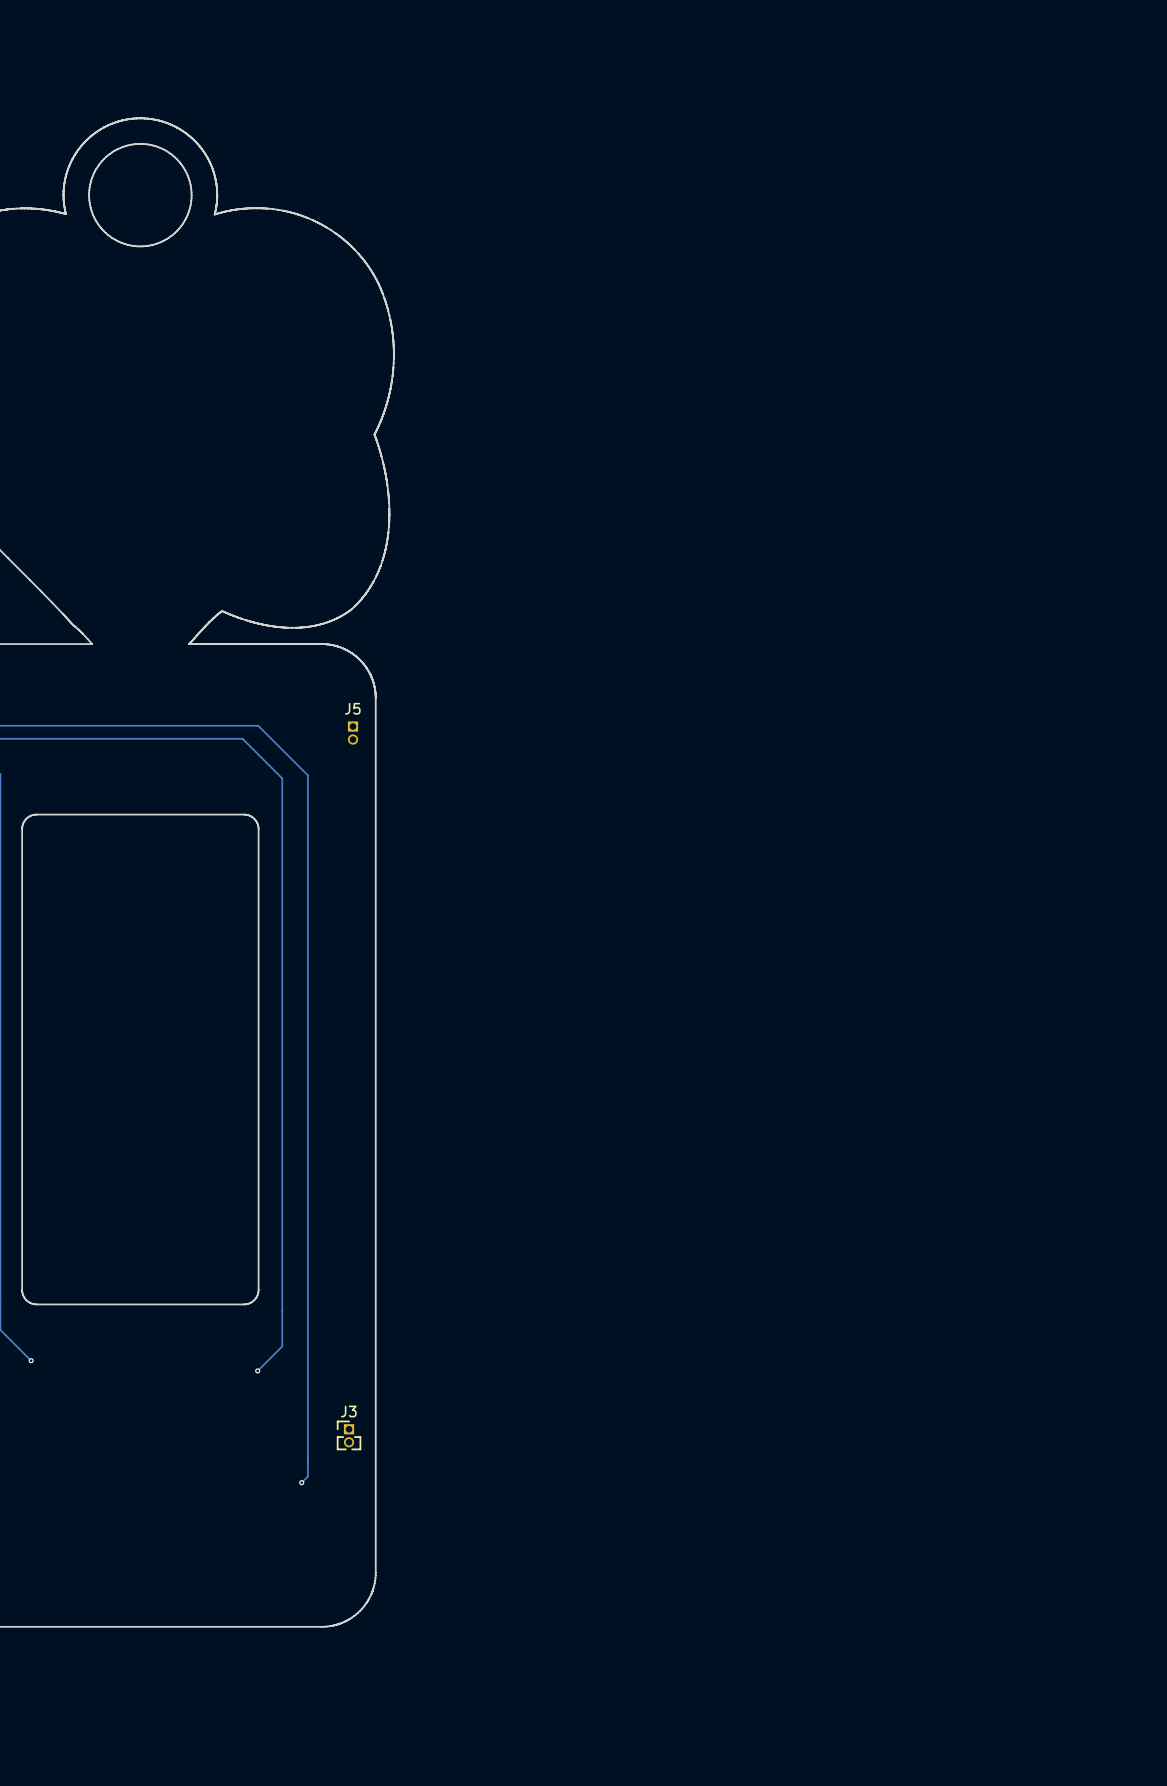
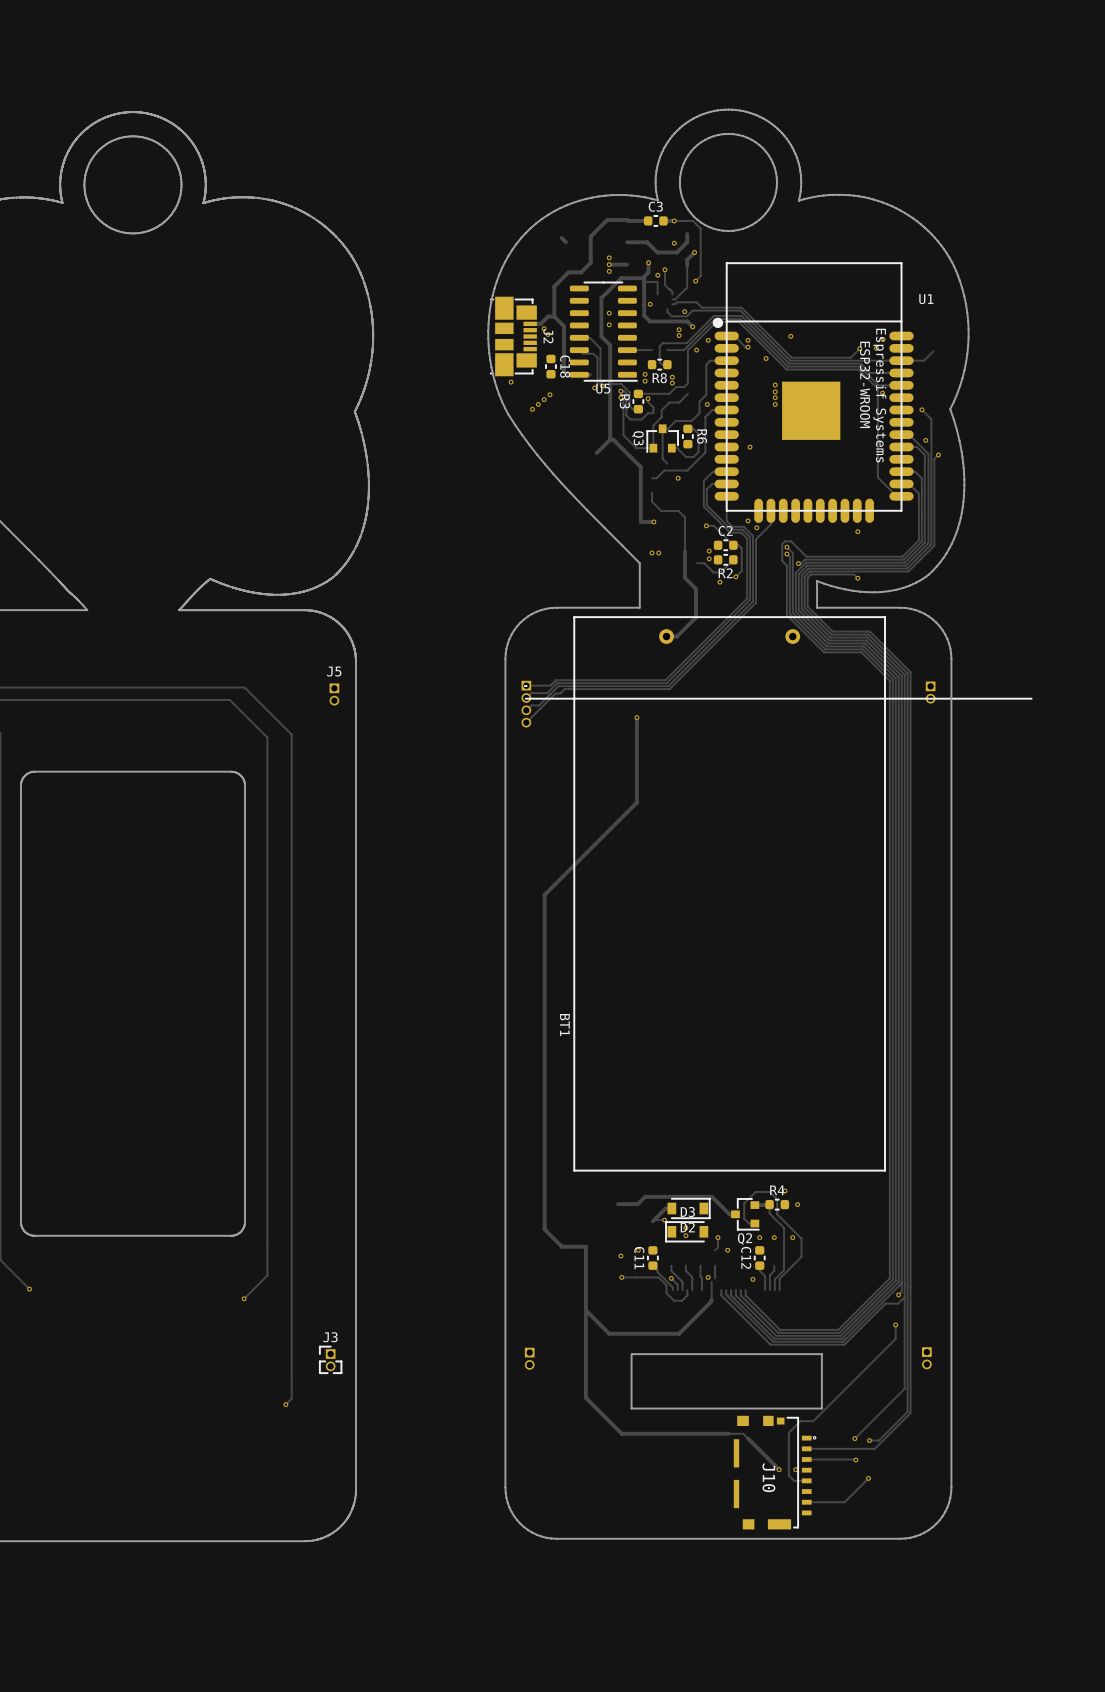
drawing: none -> [487, 109, 970, 1540]
track: none -> (648, 220) (607, 219) (590, 236) (590, 262) (581, 272) (568, 272) (554, 286) (554, 316)
C3: none -> (655, 220)
track: none -> (663, 220) (692, 220) (700, 228) (700, 276) (695, 281)
via: none -> (674, 220)
track: none -> (687, 233) (687, 242) (676, 252) (657, 252) (647, 242) (627, 242)
track: none -> (561, 237) (566, 242)
via: none -> (674, 243)
track: none -> (694, 252) (687, 259) (687, 287) (675, 299) (672, 299)
via: none -> (694, 252)
via: none -> (609, 257)
track: none -> (648, 262) (648, 272) (642, 278)
via: none -> (648, 262)
via: none -> (609, 264)
track: none -> (627, 264) (609, 264)
track: none -> (664, 269) (664, 285) (672, 291) (672, 294)
via: none -> (664, 269)
via: none -> (609, 271)
via: none -> (657, 275)
via: none -> (695, 281)
track: none -> (644, 283) (657, 282) (657, 294)
via: none -> (650, 304)
track: none -> (672, 304) (677, 302) (696, 302) (702, 307) (741, 307) (791, 357) (850, 357) (859, 348)
track: none -> (667, 309) (671, 316) (686, 316) (692, 310) (740, 310) (790, 360) (924, 360) (933, 351)
via: none -> (684, 311)
via: none -> (609, 313)
track: none -> (554, 316) (548, 316) (540, 323) (530, 323)
track: none -> (554, 316) (564, 326) (564, 371) (566, 374) (589, 374)
via: none -> (609, 324)
track: none -> (692, 326) (687, 321) (650, 321) (644, 315) (644, 278) (621, 278) (601, 298) (601, 336) (610, 345) (610, 439)
via: none -> (692, 326)
via: none -> (544, 328)
via: none -> (679, 329)
U5: none -> (603, 331)
via: none -> (548, 334)
via: none -> (679, 335)
track: none -> (734, 336) (745, 347) (748, 347)
J2: none -> (513, 336)
via: none -> (790, 336)
track: none -> (579, 337) (589, 337) (600, 348) (600, 384) (602, 386)
via: none -> (883, 339)
via: none -> (708, 340)
via: none -> (748, 340)
via: none -> (748, 347)
via: none -> (876, 348)
via: none -> (859, 348)
track: none -> (579, 350) (582, 353) (593, 353) (597, 357) (597, 385) (594, 387)
track: none -> (652, 350) (627, 350)
track: none -> (667, 350) (683, 350) (715, 319) (740, 319) (787, 366) (859, 366) (878, 385) (901, 385)
via: none -> (696, 350)
via: none -> (766, 358)
track: none -> (726, 360) (710, 360) (706, 364) (706, 394) (699, 401) (699, 413) (691, 420) (675, 420) (667, 428) (662, 428) (662, 458) (667, 463)
R8: none -> (659, 364)
track: none -> (667, 364) (662, 364) (659, 362) (659, 346) (662, 343) (686, 343) (713, 316) (741, 316) (789, 363) (860, 363) (870, 373) (901, 373)
C18: none -> (550, 366)
via: none -> (645, 374)
via: none -> (672, 377)
via: none -> (645, 381)
via: none -> (511, 382)
via: none -> (672, 383)
track: none -> (610, 384) (621, 384) (629, 392) (629, 406) (632, 409) (638, 409)
via: none -> (775, 385)
via: none -> (602, 386)
via: none -> (594, 387)
track: none -> (620, 391) (626, 393) (626, 415) (630, 419) (641, 419) (648, 413) (653, 413) (653, 407) (648, 402) (648, 398)
via: none -> (620, 391)
via: none -> (775, 391)
U1: none -> (813, 392)
via: none -> (882, 393)
track: none -> (638, 393) (669, 393) (676, 386) (684, 386) (687, 383) (687, 350) (716, 321) (739, 321) (786, 369) (858, 369) (877, 388) (877, 477) (896, 496) (901, 496)
track: none -> (687, 393) (679, 402) (669, 402) (661, 410) (661, 417) (653, 425) (653, 448) (636, 448) (623, 435) (623, 400) (620, 397)
via: none -> (549, 394)
via: none -> (620, 397)
via: none -> (775, 397)
via: none -> (648, 398)
via: none -> (544, 399)
R3: none -> (638, 401)
via: none -> (538, 404)
via: none -> (707, 404)
via: none -> (775, 404)
via: none -> (532, 409)
track: none -> (726, 410) (712, 410) (705, 417) (705, 452) (687, 470) (664, 470) (656, 478) (652, 478)
track: none -> (921, 409) (931, 419) (931, 544) (907, 568) (808, 568) (801, 575) (801, 608) (830, 637) (867, 637) (904, 674) (904, 1388) (854, 1438)
via: none -> (921, 409)
track: none -> (687, 428) (693, 428) (698, 433) (698, 452) (693, 456) (685, 456) (677, 448) (671, 448)
track: none -> (901, 434) (909, 434) (928, 453) (928, 543) (906, 565) (807, 565) (798, 574) (798, 610) (829, 640) (866, 640) (901, 675) (901, 1291) (898, 1294)
R6: none -> (687, 436)
Q3: none -> (662, 438)
track: none -> (610, 439) (596, 453)
track: none -> (610, 439) (613, 439) (640, 467) (640, 521) (653, 521)
via: none -> (925, 440)
track: none -> (901, 447) (916, 447) (924, 454) (924, 542) (904, 562) (806, 562) (795, 572) (795, 611) (827, 643) (865, 643) (898, 677) (898, 1282) (842, 1338) (774, 1338) (731, 1295) (731, 1290)
via: none -> (750, 447)
track: none -> (938, 454) (934, 459) (934, 545) (908, 571) (809, 571) (804, 576) (804, 607) (831, 634) (868, 634) (907, 673) (907, 1411) (878, 1440) (869, 1440)
via: none -> (938, 454)
track: none -> (726, 471) (713, 471) (703, 480) (703, 506) (730, 532) (741, 532) (747, 538) (747, 598) (665, 680) (555, 680) (550, 685) (526, 685)
track: none -> (901, 471) (915, 471) (921, 478) (921, 541) (903, 559) (804, 559) (800, 564) (798, 563)
via: none -> (678, 478)
track: none -> (726, 483) (712, 483) (706, 489) (706, 505) (731, 529) (742, 529) (750, 537) (750, 599) (666, 683) (557, 683) (547, 693) (531, 693) (526, 697)
track: none -> (901, 483) (909, 483) (918, 493) (918, 540) (902, 556) (806, 556) (791, 541) (784, 541) (782, 544) (782, 560) (786, 565) (786, 615) (824, 652) (861, 652) (889, 680) (889, 1278) (838, 1329) (780, 1329) (745, 1295) (745, 1290)
track: none -> (652, 492) (652, 501) (661, 510) (678, 510) (684, 517) (684, 577) (696, 588) (696, 616) (676, 636) (666, 636)
track: none -> (726, 496) (726, 520) (732, 526) (743, 526) (753, 536) (753, 601) (668, 686) (558, 686) (539, 705) (531, 705) (526, 710)
track: none -> (770, 510) (770, 524) (755, 539) (755, 602) (669, 689) (564, 689) (560, 693) (555, 693) (526, 722)
via: none -> (748, 520)
via: none -> (653, 521)
track: none -> (706, 525) (713, 525) (733, 545) (738, 545) (741, 548) (741, 571) (735, 576)
via: none -> (706, 525)
via: none -> (756, 527)
via: none -> (857, 531)
C2: none -> (725, 545)
track: none -> (786, 547) (792, 553) (792, 612) (826, 646) (863, 646) (895, 678) (895, 1280) (840, 1335) (776, 1335) (735, 1295) (735, 1290)
via: none -> (786, 547)
via: none -> (709, 551)
via: none -> (651, 553)
via: none -> (658, 553)
track: none -> (786, 554) (789, 556) (789, 613) (825, 649) (862, 649) (892, 679) (892, 1279) (839, 1332) (778, 1332) (740, 1295) (740, 1290)
via: none -> (786, 554)
via: none -> (709, 558)
R2: none -> (725, 559)
track: none -> (733, 559) (720, 572) (713, 572) (704, 563) (697, 563)
via: none -> (798, 563)
via: none -> (735, 576)
track: none -> (857, 578) (854, 574) (810, 574) (807, 577) (807, 606) (832, 631) (869, 631) (910, 672) (910, 1413) (874, 1448) (806, 1448)
via: none -> (857, 578)
via: none -> (719, 582)
line: none -> (526, 686) (524, 686)
part: none -> (930, 692)
line: none -> (1031, 698) (525, 698)
part: none -> (526, 704)
track: none -> (636, 717) (636, 802) (544, 894) (544, 1229) (562, 1246) (585, 1246) (585, 1397) (621, 1433) (743, 1433) (779, 1469)
via: none -> (636, 717)
BT1: none -> (729, 893)
via: none -> (784, 1191)
track: none -> (625, 1204) (617, 1204) (637, 1204) (645, 1196) (712, 1196) (729, 1214) (735, 1214)
R4: none -> (777, 1204)
via: none -> (797, 1204)
track: none -> (754, 1205) (769, 1204) (769, 1213) (784, 1227) (784, 1270) (774, 1279) (774, 1290)
track: none -> (671, 1208) (665, 1208) (652, 1221) (664, 1220)
D2: none -> (688, 1208)
Q2: none -> (745, 1214)
via: none -> (664, 1220)
track: none -> (754, 1223) (749, 1223) (744, 1218) (744, 1203) (755, 1191) (770, 1191) (777, 1199) (777, 1214) (801, 1238) (801, 1256) (779, 1278) (779, 1290)
via: none -> (685, 1227)
D3: none -> (686, 1231)
via: none -> (685, 1235)
track: none -> (717, 1237) (717, 1247) (715, 1250)
via: none -> (717, 1237)
via: none -> (759, 1237)
via: none -> (774, 1237)
via: none -> (792, 1237)
via: none -> (638, 1250)
via: none -> (727, 1250)
via: none -> (620, 1256)
C11: none -> (652, 1258)
C12: none -> (759, 1258)
track: none -> (652, 1265) (672, 1287) (672, 1290)
track: none -> (671, 1265) (671, 1270) (682, 1282) (682, 1290)
track: none -> (685, 1265) (685, 1270) (692, 1277) (692, 1290)
track: none -> (700, 1265) (701, 1290)
track: none -> (715, 1265) (715, 1278)
track: none -> (759, 1265) (759, 1270) (765, 1276) (765, 1290)
track: none -> (774, 1265) (774, 1270) (769, 1275) (769, 1290)
track: none -> (621, 1277) (658, 1277) (666, 1285) (666, 1293) (674, 1300) (682, 1300) (687, 1295) (687, 1290)
via: none -> (621, 1277)
via: none -> (708, 1277)
track: none -> (671, 1278) (677, 1284) (677, 1290)
via: none -> (671, 1278)
via: none -> (752, 1279)
track: none -> (711, 1281) (711, 1301) (679, 1333) (609, 1333) (585, 1310)
track: none -> (901, 1283) (843, 1341) (773, 1341) (728, 1296) (726, 1290)
track: none -> (721, 1290) (721, 1295) (770, 1344) (844, 1344) (885, 1303) (898, 1303) (904, 1297)
via: none -> (898, 1294)
track: none -> (895, 1325) (895, 1338) (813, 1421) (800, 1421) (788, 1432) (788, 1475) (794, 1480) (806, 1480)
via: none -> (895, 1325)
board edge: none -> (632, 1354) (821, 1354) (821, 1408) (631, 1408) (631, 1354)
part: none -> (926, 1358)
part: none -> (529, 1358)
via: none -> (854, 1438)
via: none -> (869, 1440)
track: none -> (806, 1459) (855, 1459)
via: none -> (855, 1459)
via: none -> (779, 1469)
via: none -> (795, 1469)
J10: none -> (775, 1472)
track: none -> (868, 1478) (844, 1502) (806, 1502)
via: none -> (868, 1478)

